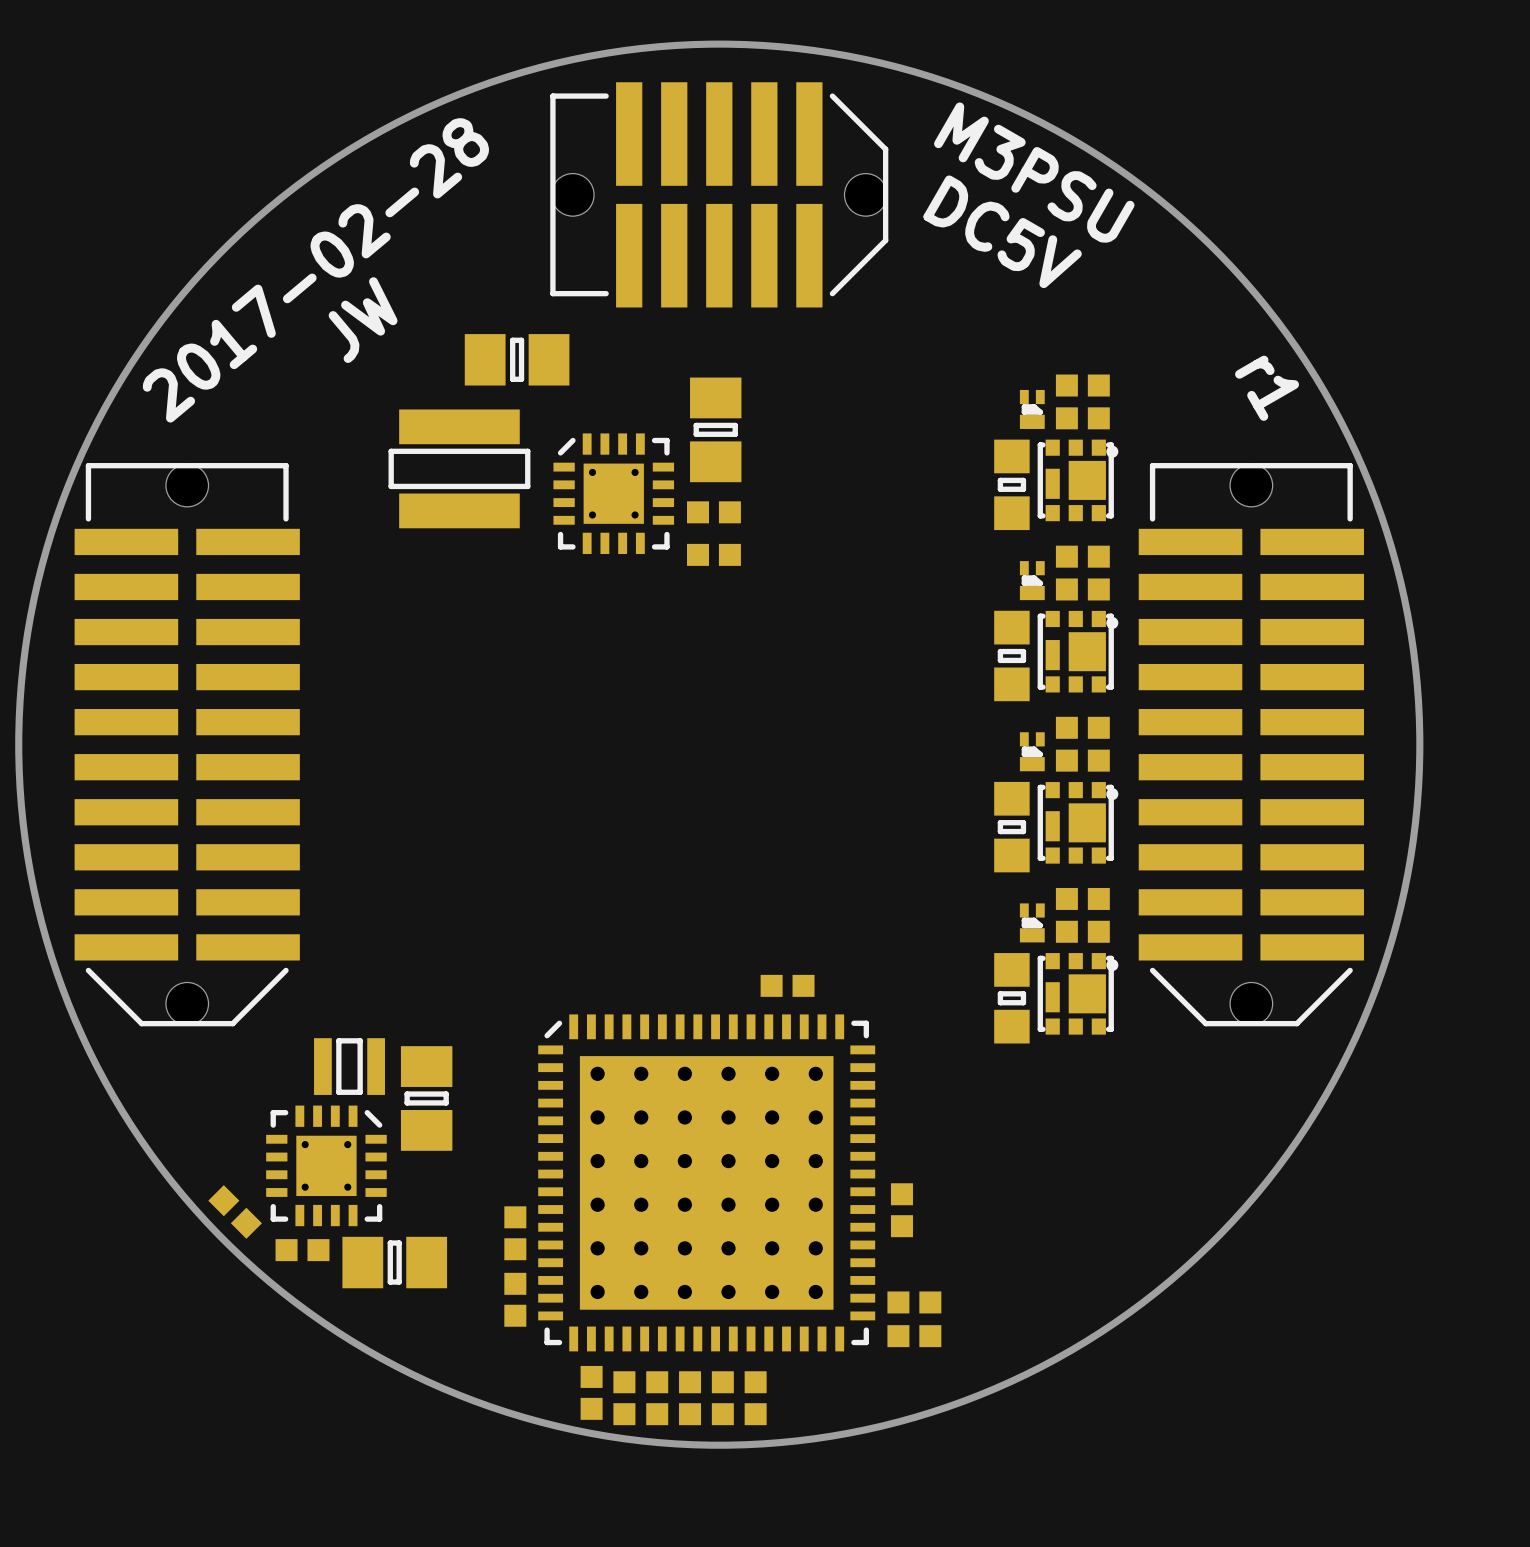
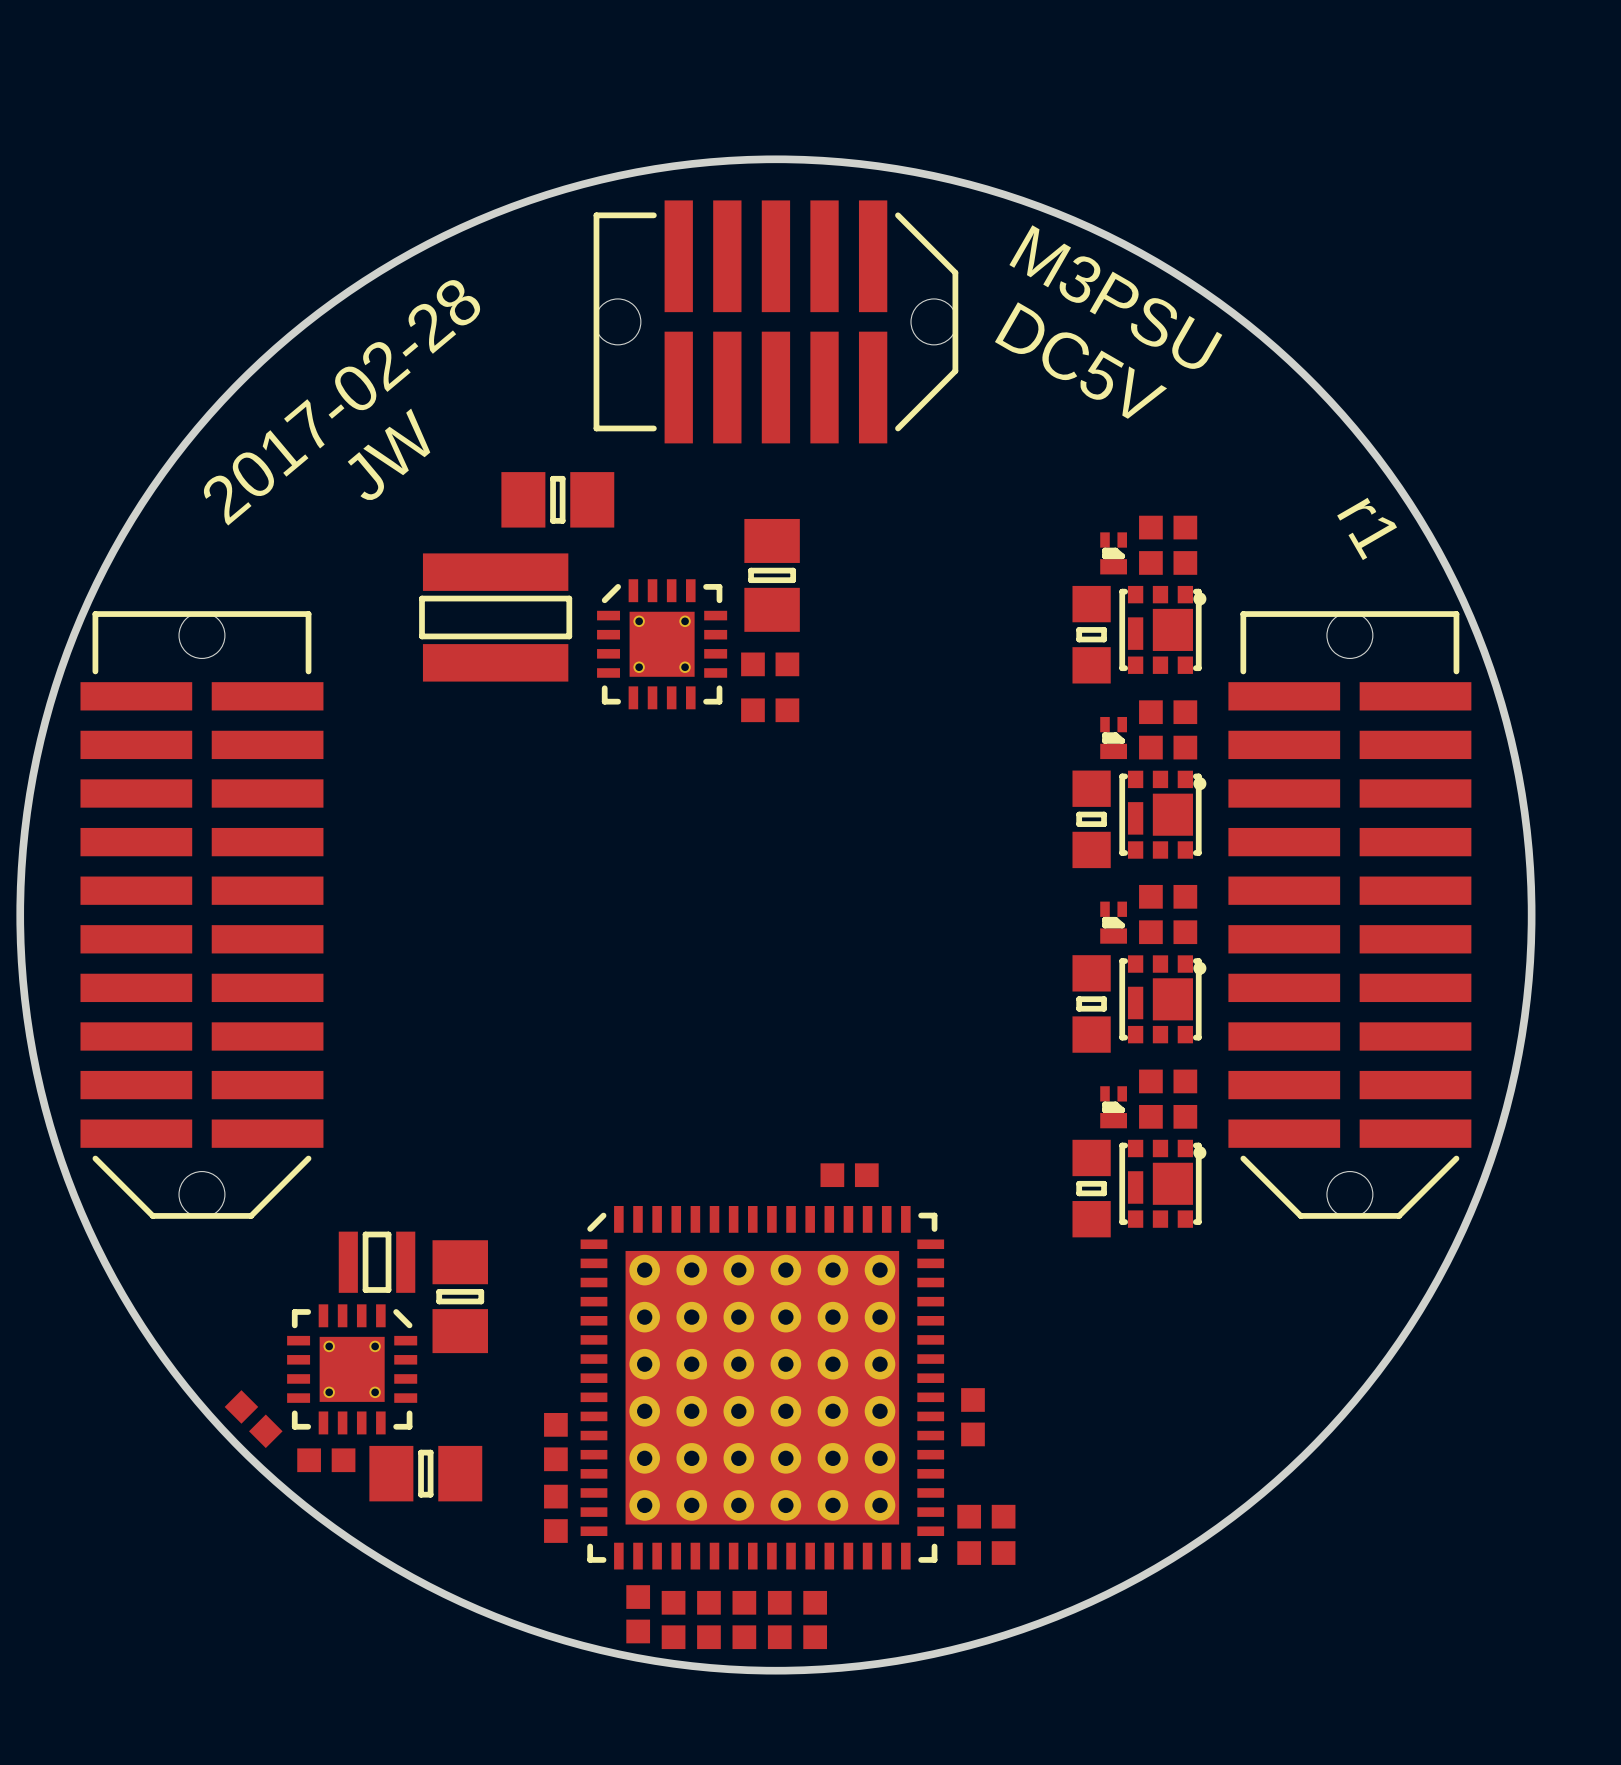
part footprint: [388, 409, 531, 529] -> [419, 553, 573, 682]

